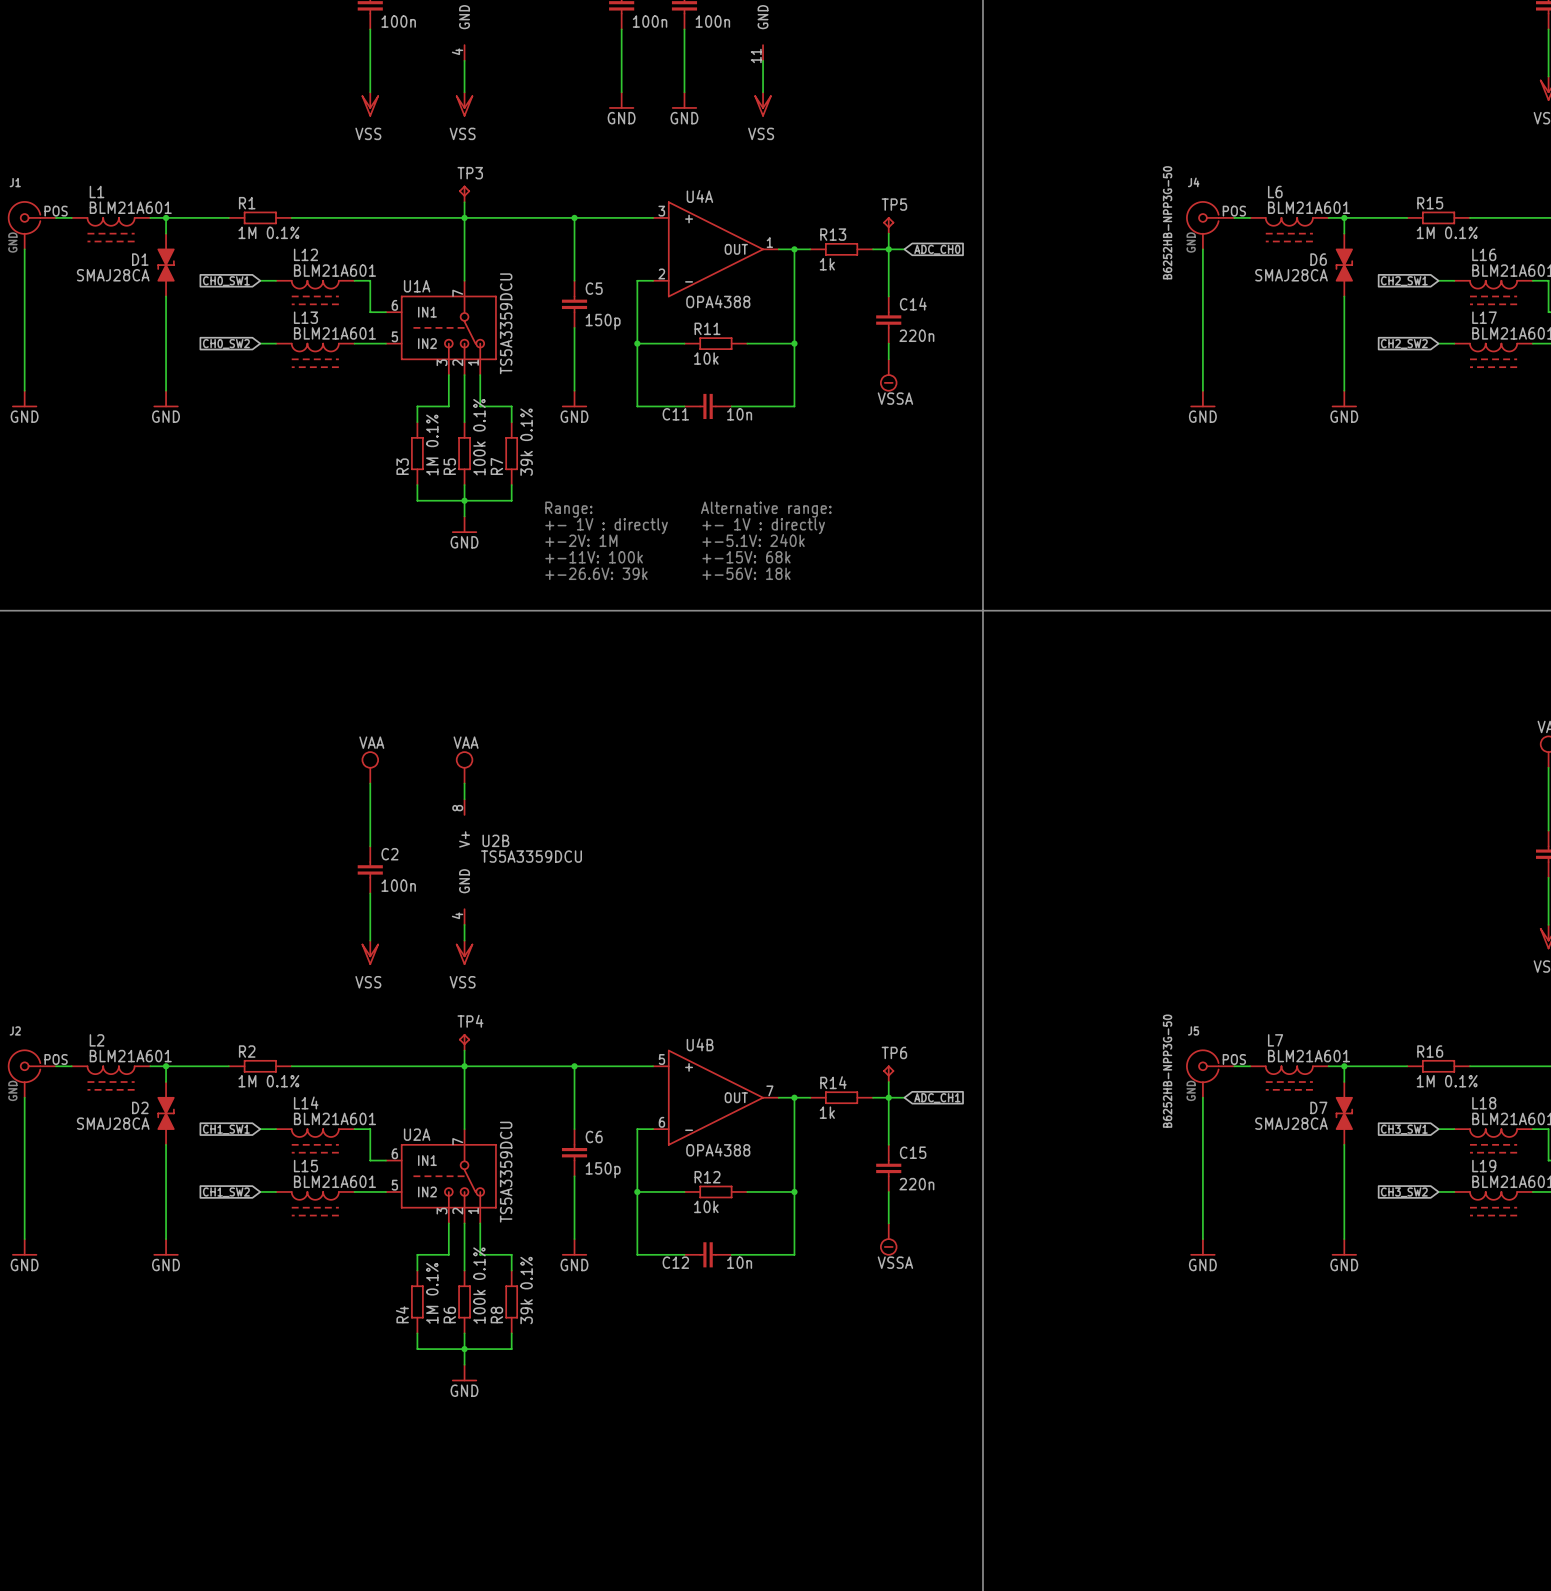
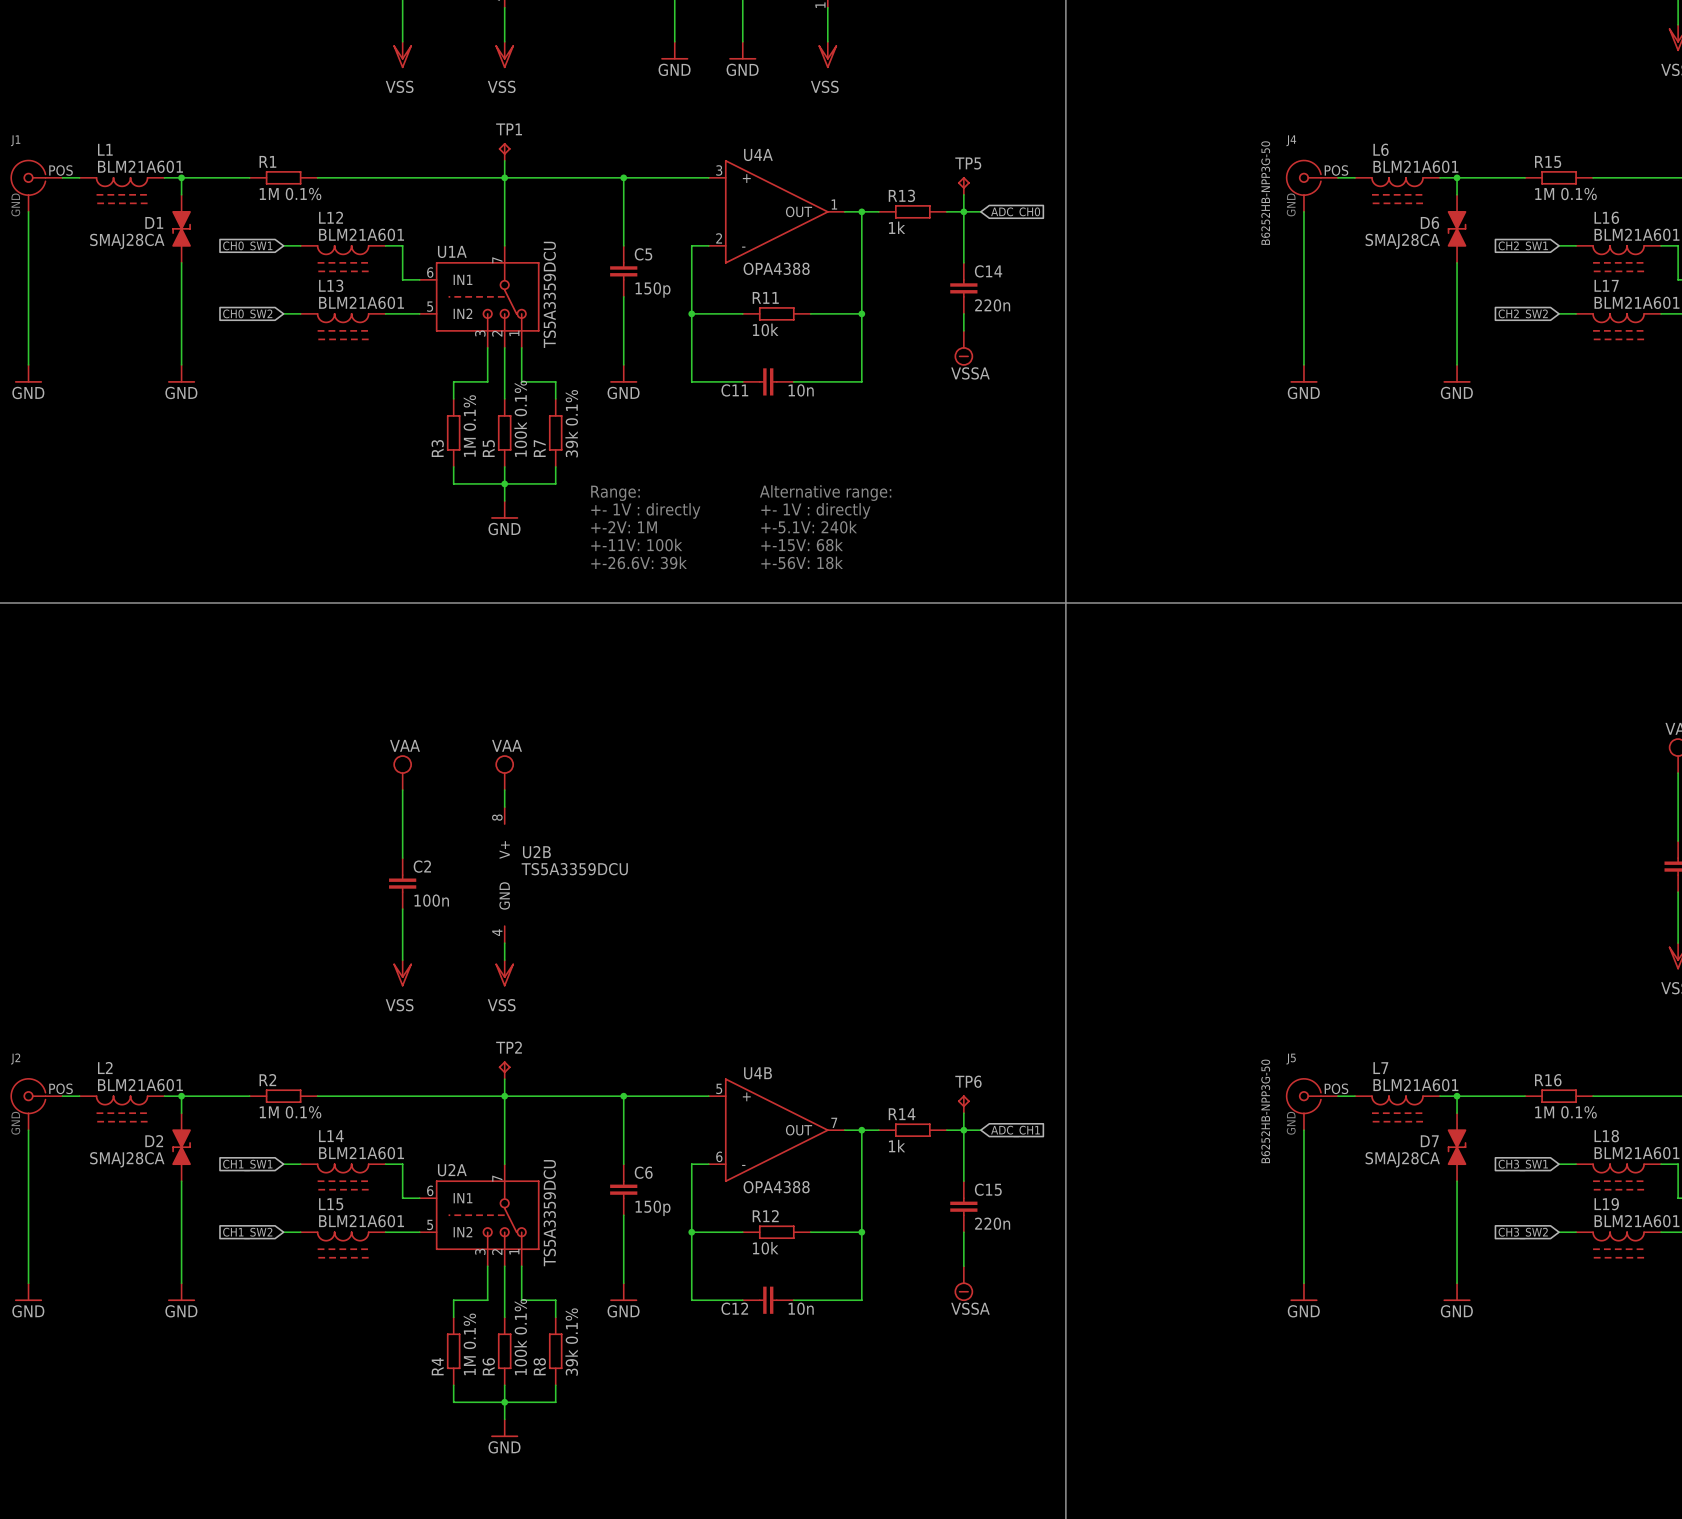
TP3 name: TP3 (470, 173) -> TP1 (509, 129)
TP4 name: TP4 (470, 1021) -> TP2 (509, 1047)

